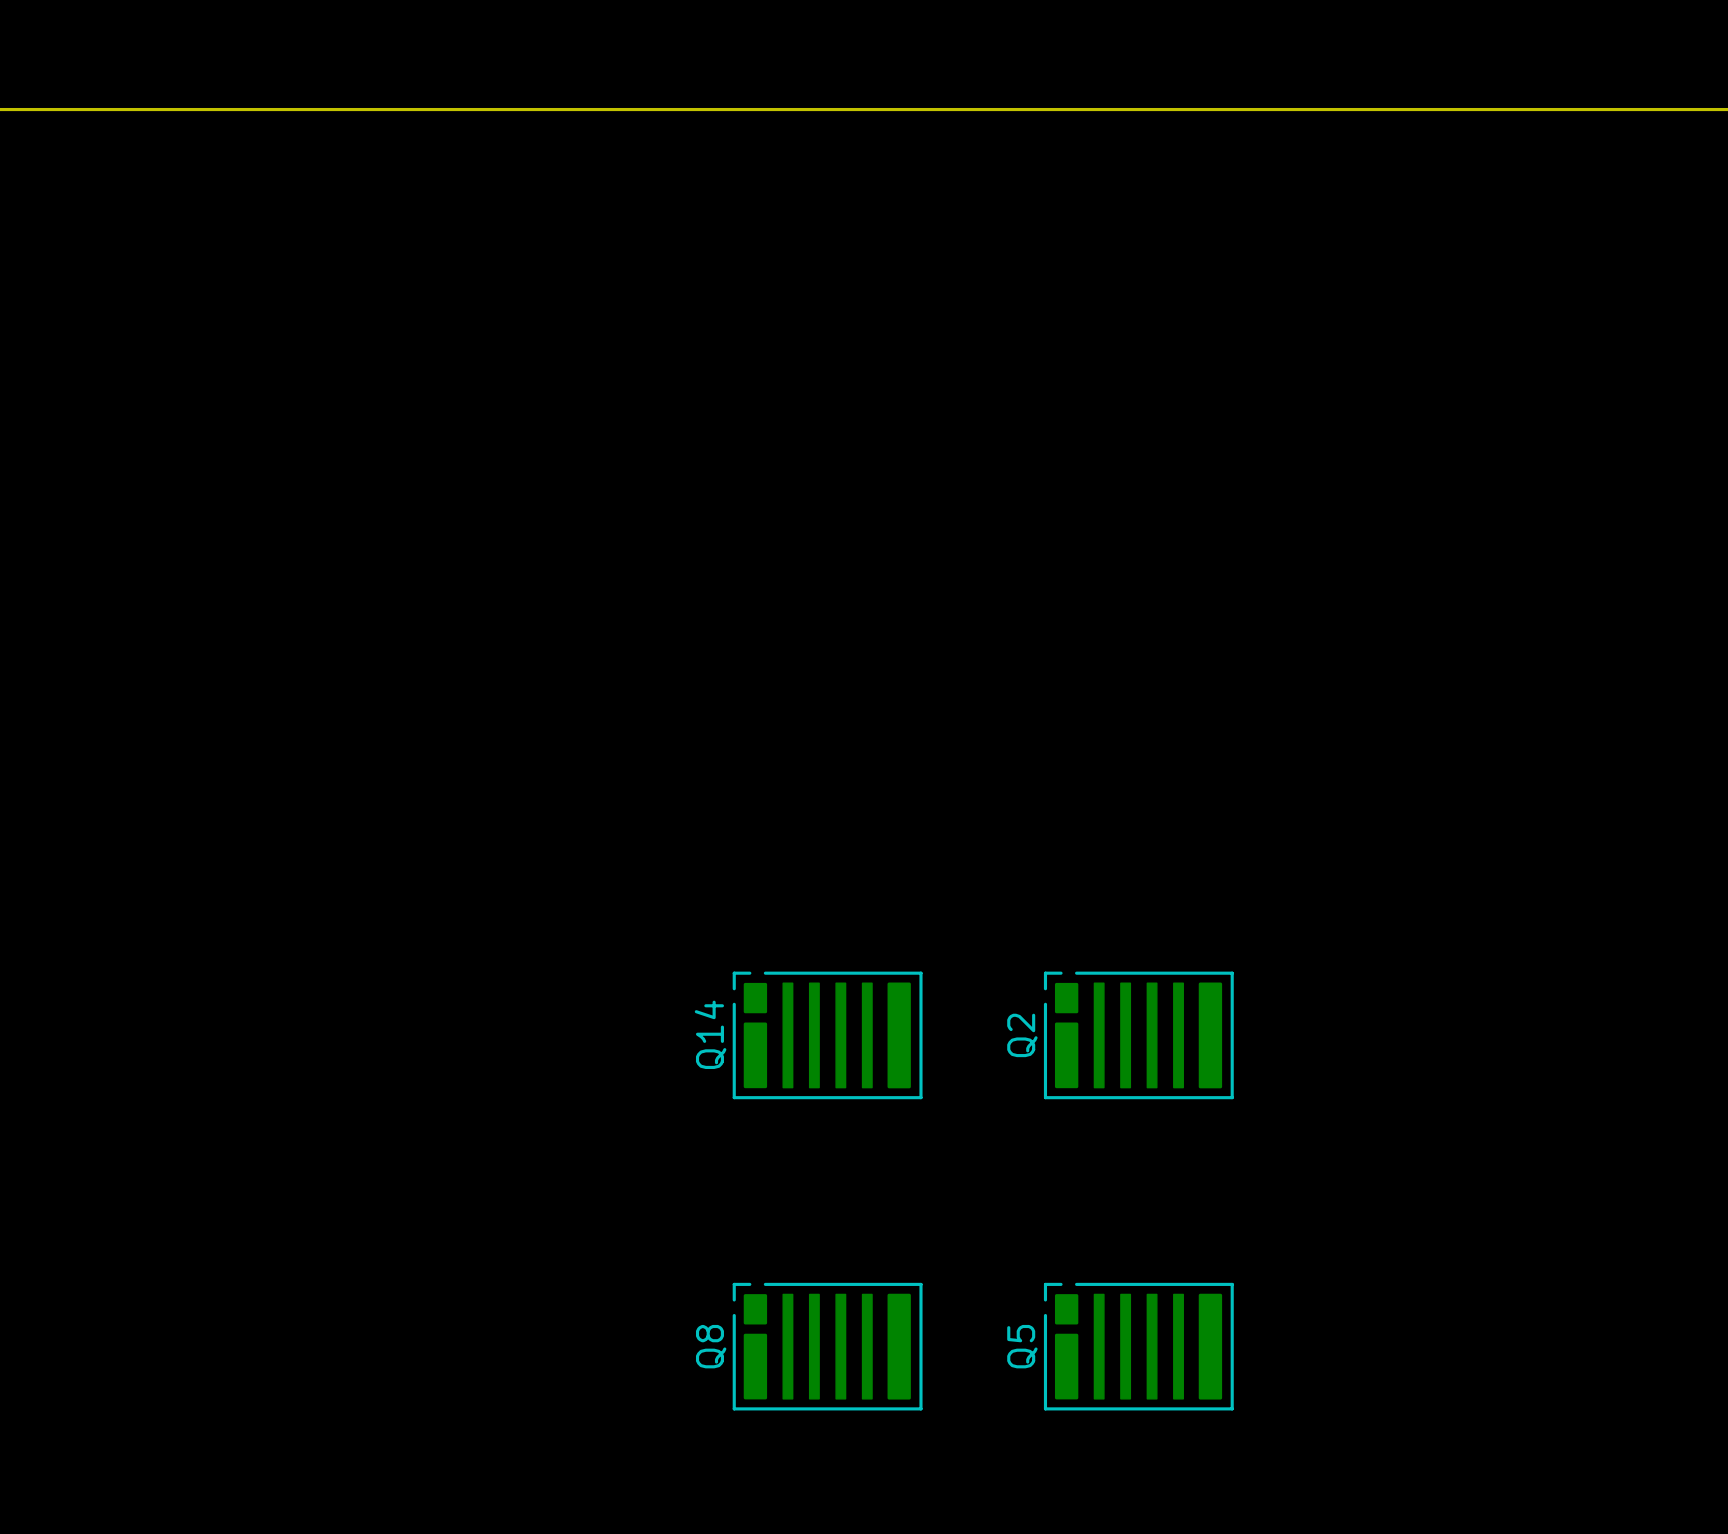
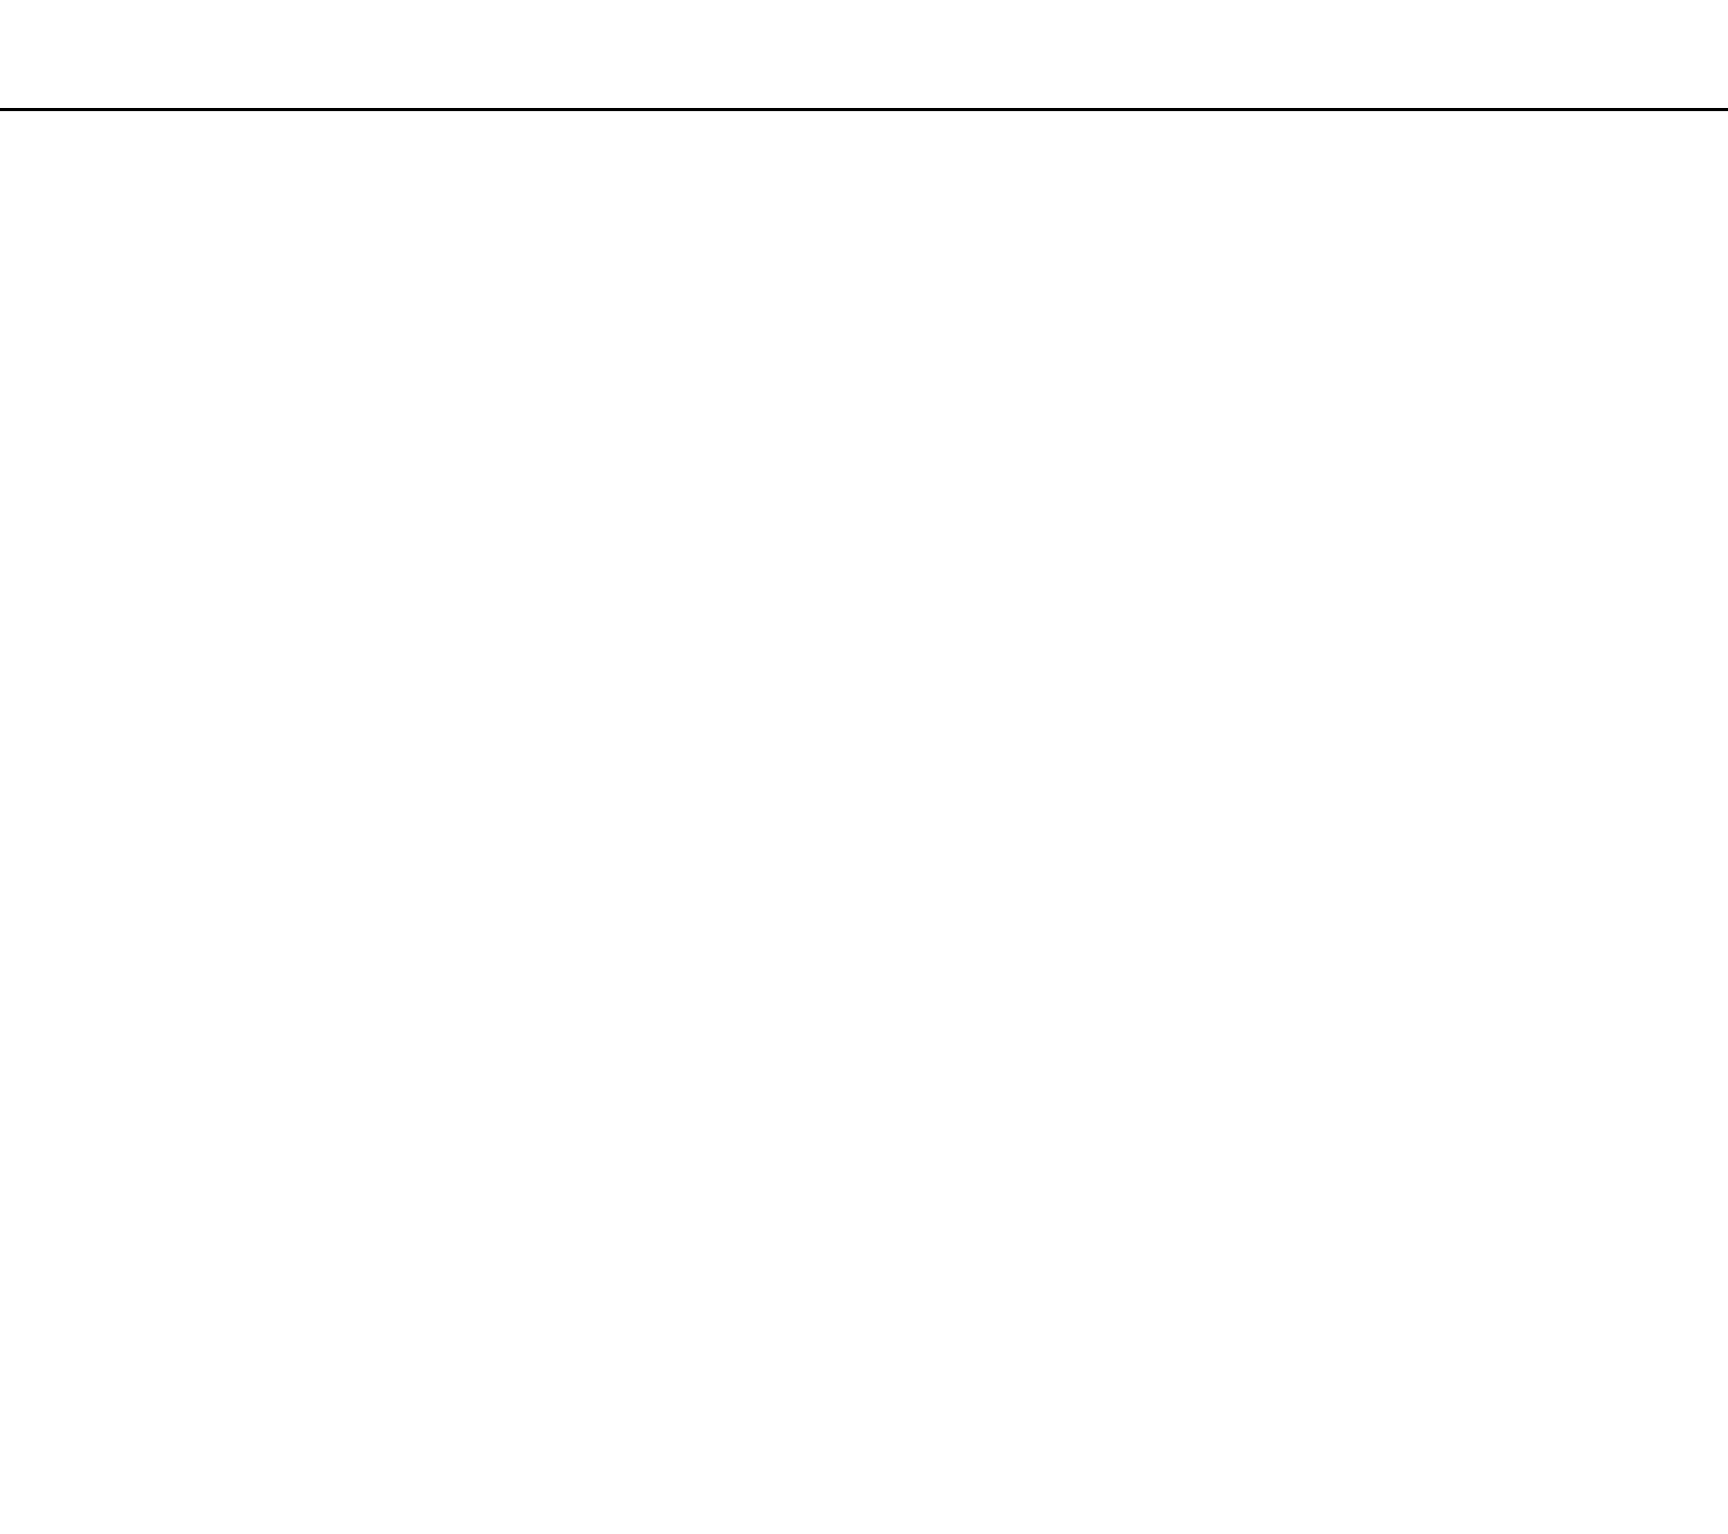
Q14: (827, 1035) -> none
Q2: (1138, 1035) -> none
Q8: (827, 1346) -> none
Q5: (1138, 1346) -> none

